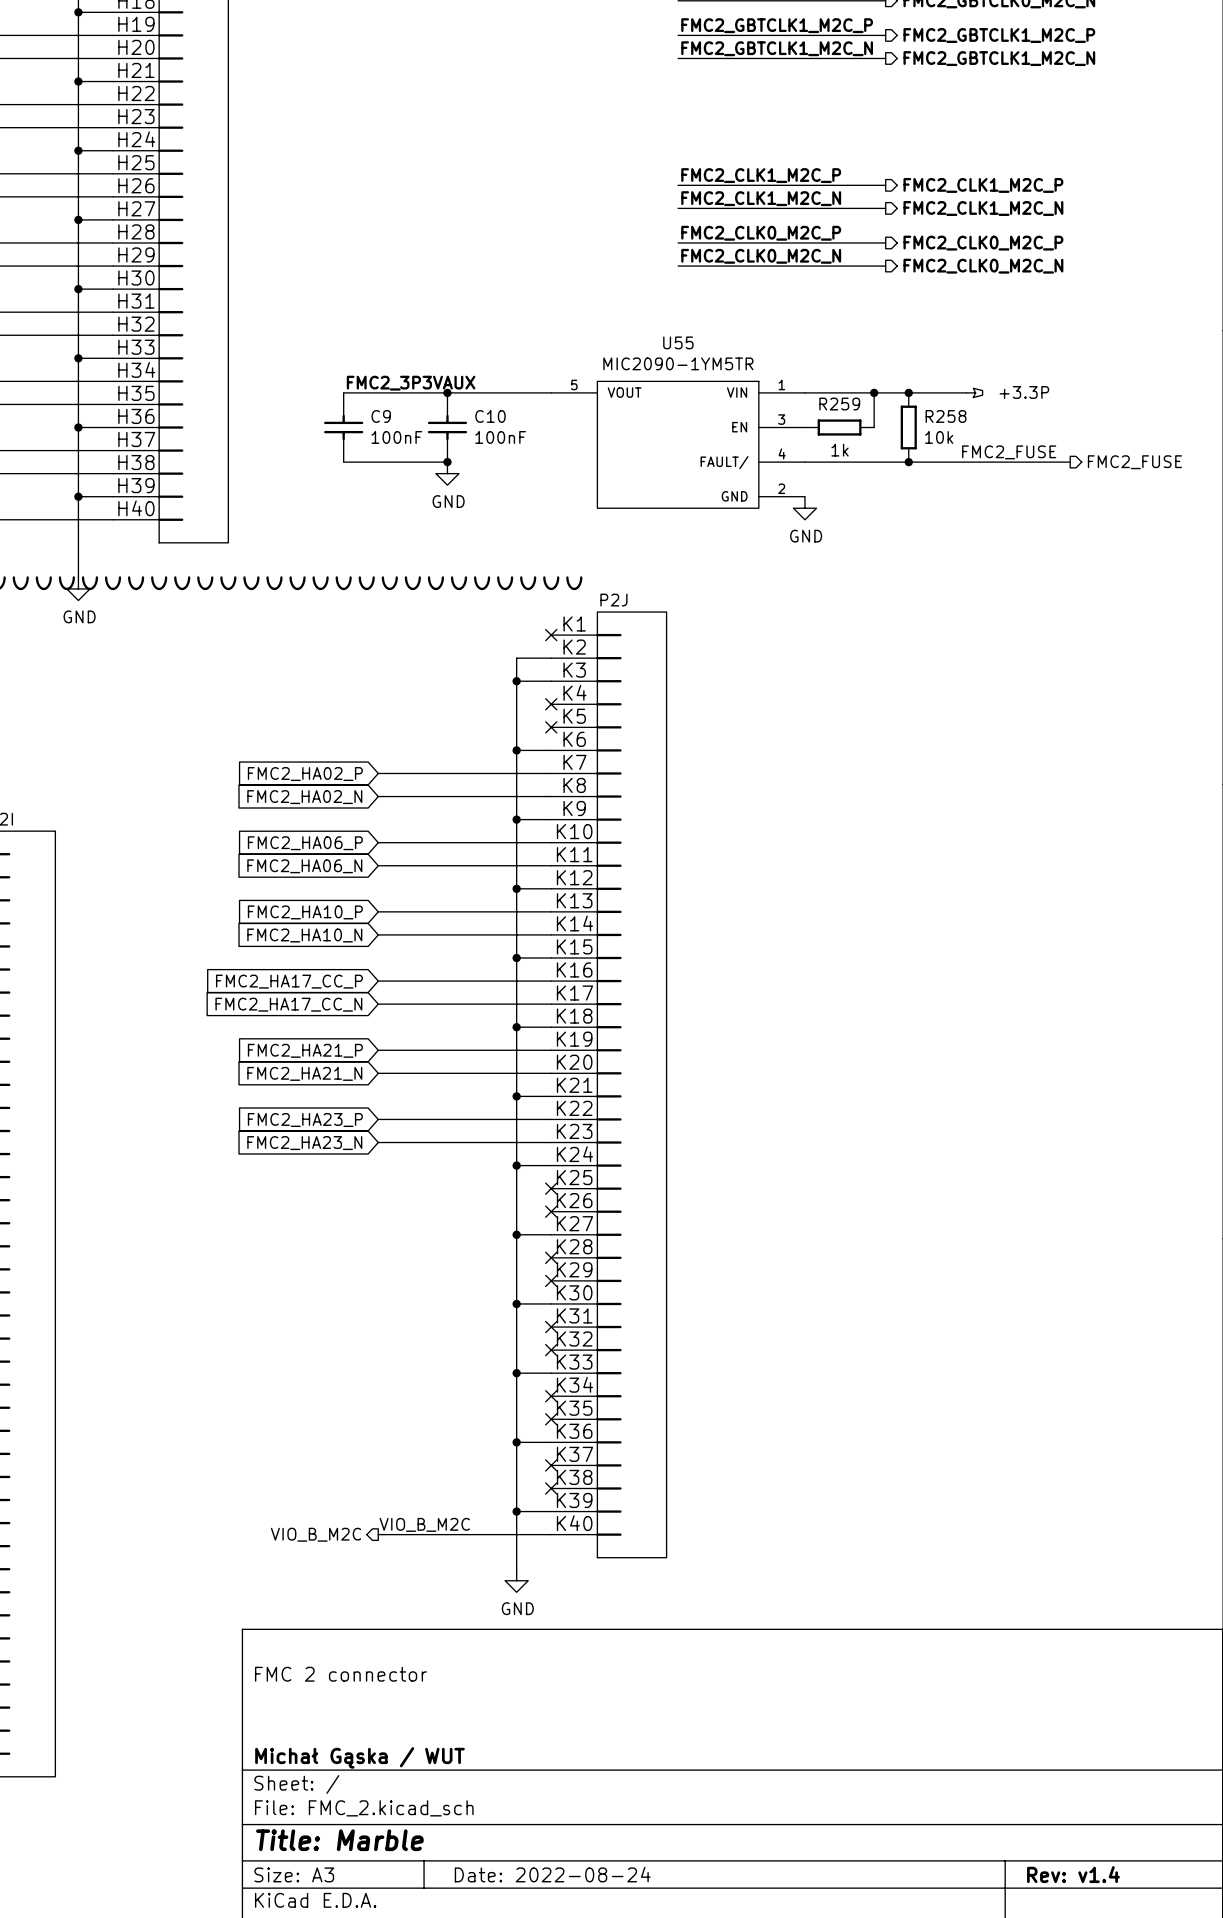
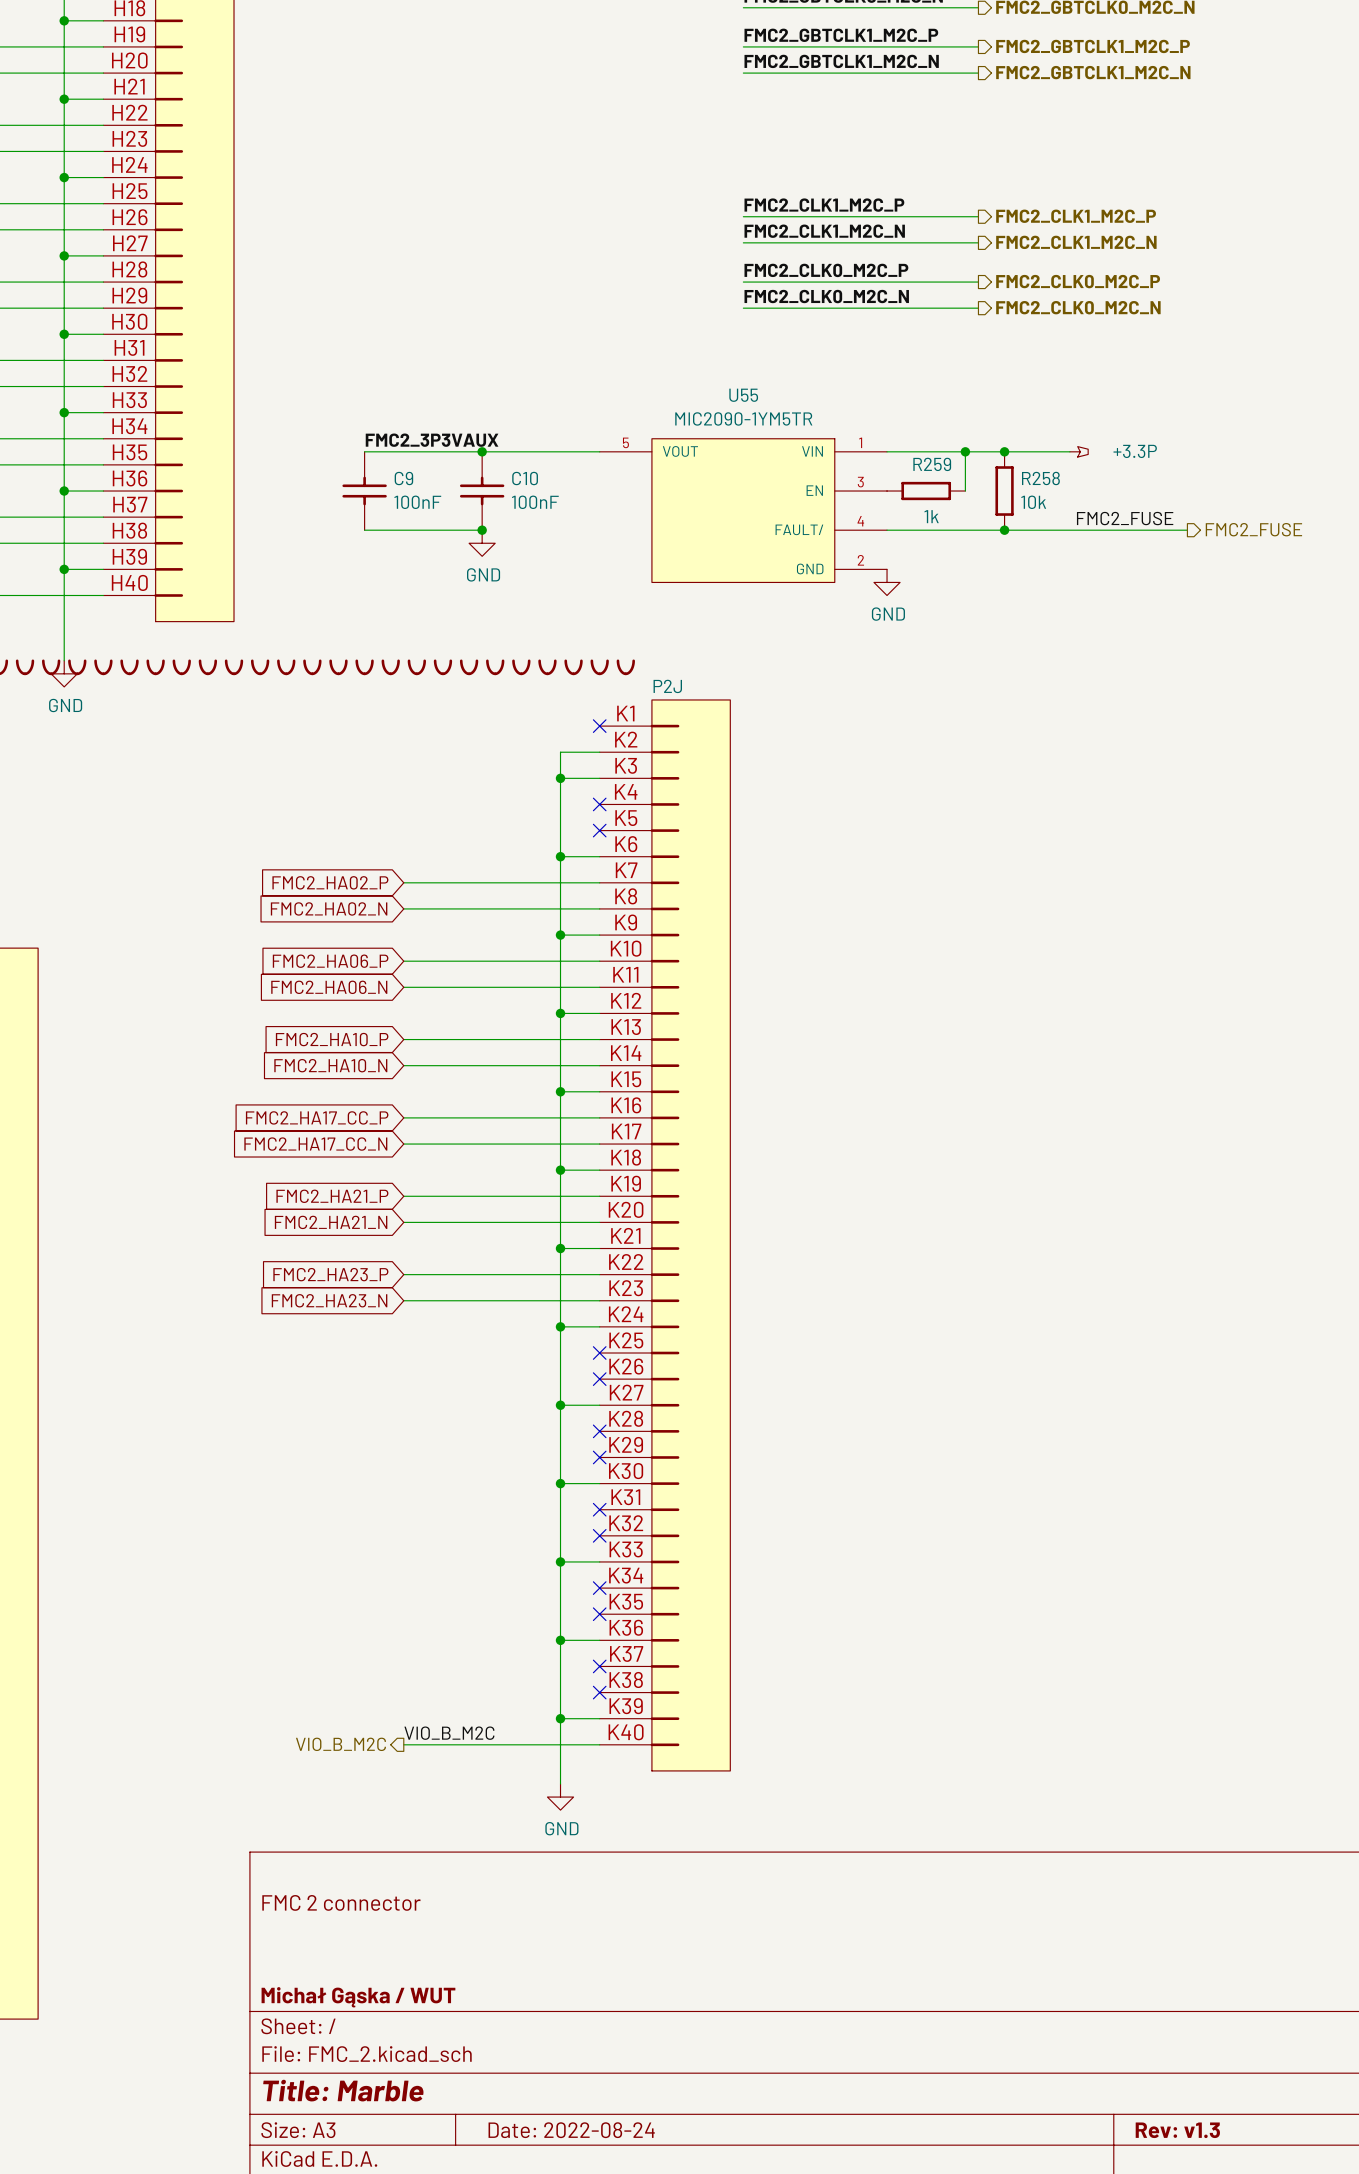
title block: Rev: v1.4 (1073, 1874) -> Rev: v1.3 (1177, 2130)

